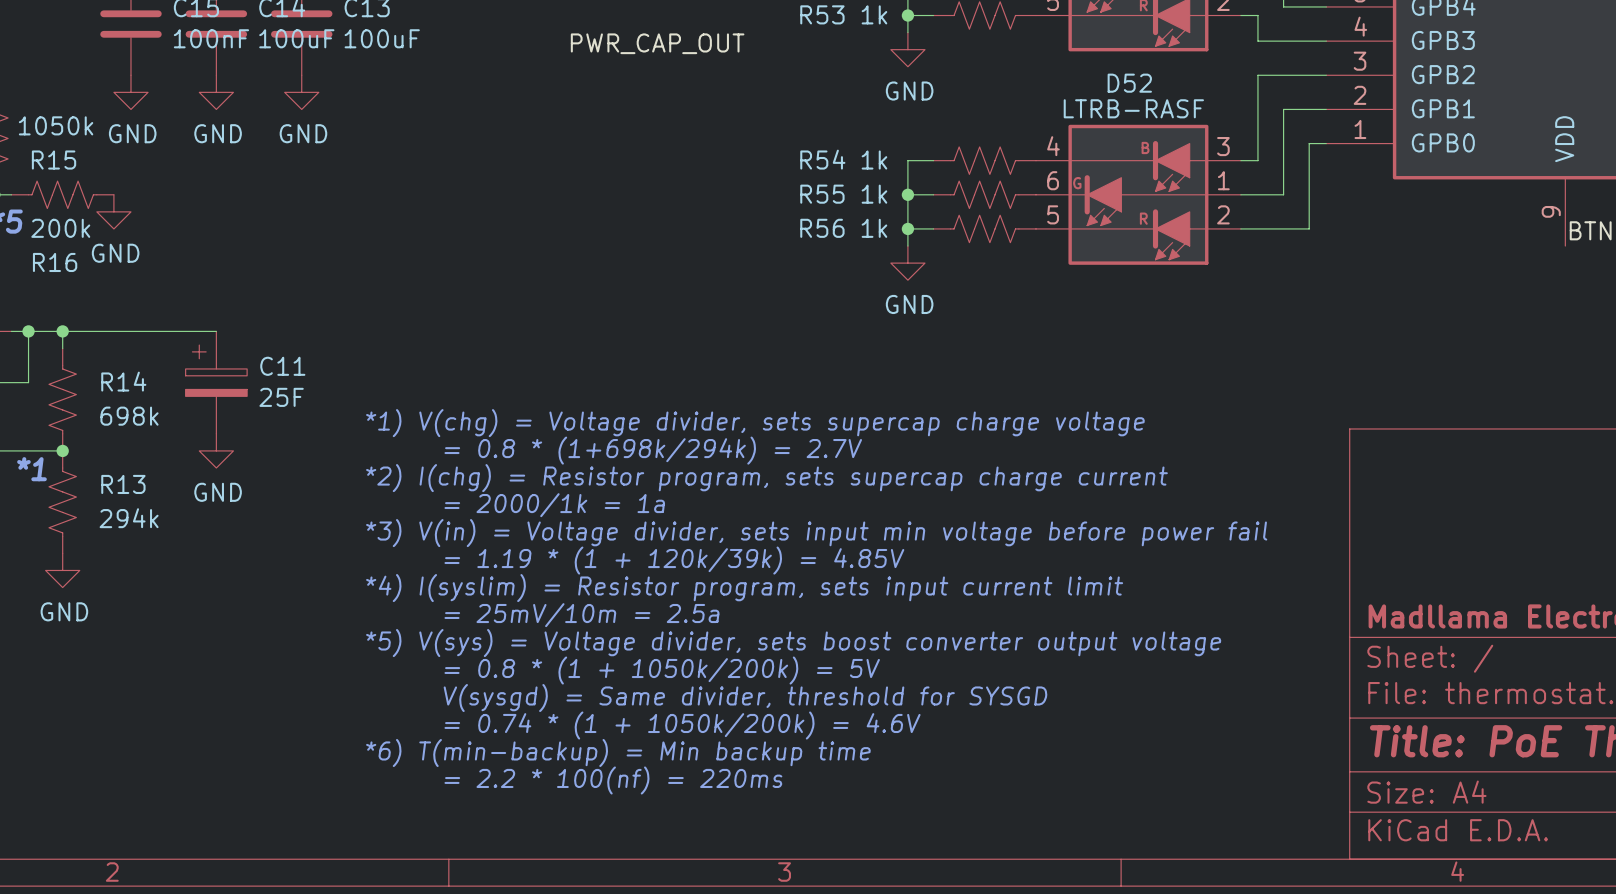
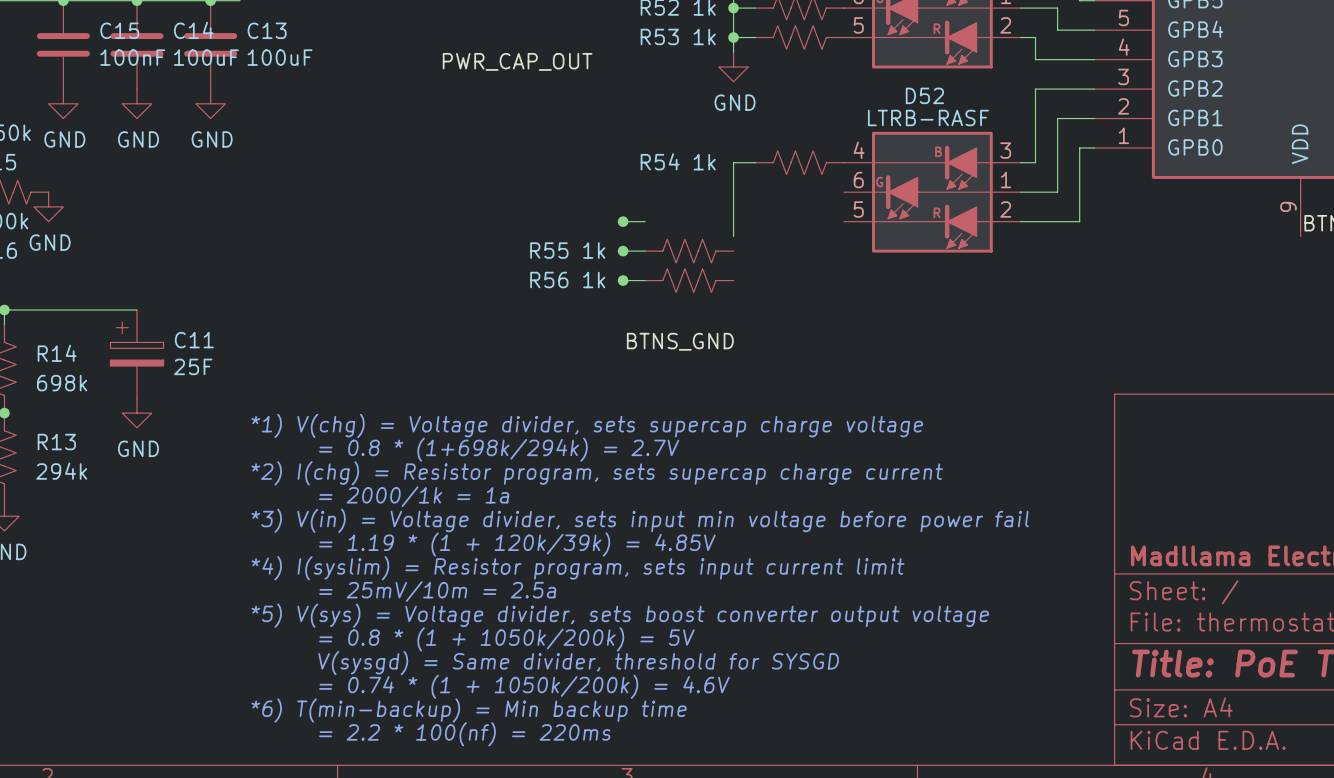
wire: (907, 194) (933, 194) -> (623, 251) (645, 251)
junction: (907, 194) -> none
R55 position: (984, 194) -> (689, 251)
wire: none -> (623, 221) (645, 221)
junction: none -> (623, 221)
wire: (907, 228) (933, 228) -> (623, 280) (645, 280)
junction: (907, 228) -> none
R56 position: (984, 228) -> (689, 280)
junction: none -> (623, 251)
power symbol: GND (907, 263) -> none
junction: none -> (623, 280)
label: none -> BTNS_GND (680, 341)
text position: *1) V(chg) = Voltage divider, sets supercap charge voltage (755, 423) -> *1) V(chg) = Voltage divider, sets supercap charge voltage (587, 425)
text position: = 0.8 * (1+698k/294k) = 2.7V (653, 450) -> = 0.8 * (1+698k/294k) = 2.7V (499, 449)
text position: *2) I(chg) = Resistor program, sets supercap charge current (766, 478) -> *2) I(chg) = Resistor program, sets supercap charge current (597, 473)
text position: = 2000/1k = 1a (554, 505) -> = 2000/1k = 1a (414, 496)
text position: *3) V(in) = Voltage divider, sets input min voltage before power fail (816, 533) -> *3) V(in) = Voltage divider, sets input min voltage before power fail (640, 520)
text position: = 1.19 * (1 + 120k/39k) = 4.85V (674, 560) -> = 1.19 * (1 + 120k/39k) = 4.85V (517, 544)
text position: *4) I(syslim) = Resistor program, sets input current limit (744, 588) -> *4) I(syslim) = Resistor program, sets input current limit (577, 568)
text position: = 25mV/10m = 2.5a (581, 615) -> = 25mV/10m = 2.5a (437, 591)
text position: *5) V(sys) = Voltage divider, sets boost converter output voltage (793, 643) -> *5) V(sys) = Voltage divider, sets boost converter output voltage (620, 615)
text position: = 0.8 * (1 + 1050k/200k) = 5V (662, 670) -> = 0.8 * (1 + 1050k/200k) = 5V (506, 639)
text position: V(sysgd) = Same divider, threshold for SYSGD (745, 698) -> V(sysgd) = Same divider, threshold for SYSGD (578, 663)
text position: = 0.74 * (1 + 1050k/200k) = 4.6V (682, 725) -> = 0.74 * (1 + 1050k/200k) = 4.6V (524, 686)
text position: *6) T(min-backup) = Min backup time (618, 753) -> *6) T(min-backup) = Min backup time (469, 710)
text position: = 2.2 * 100(nf) = 220ms (613, 780) -> = 2.2 * 100(nf) = 220ms (464, 734)

